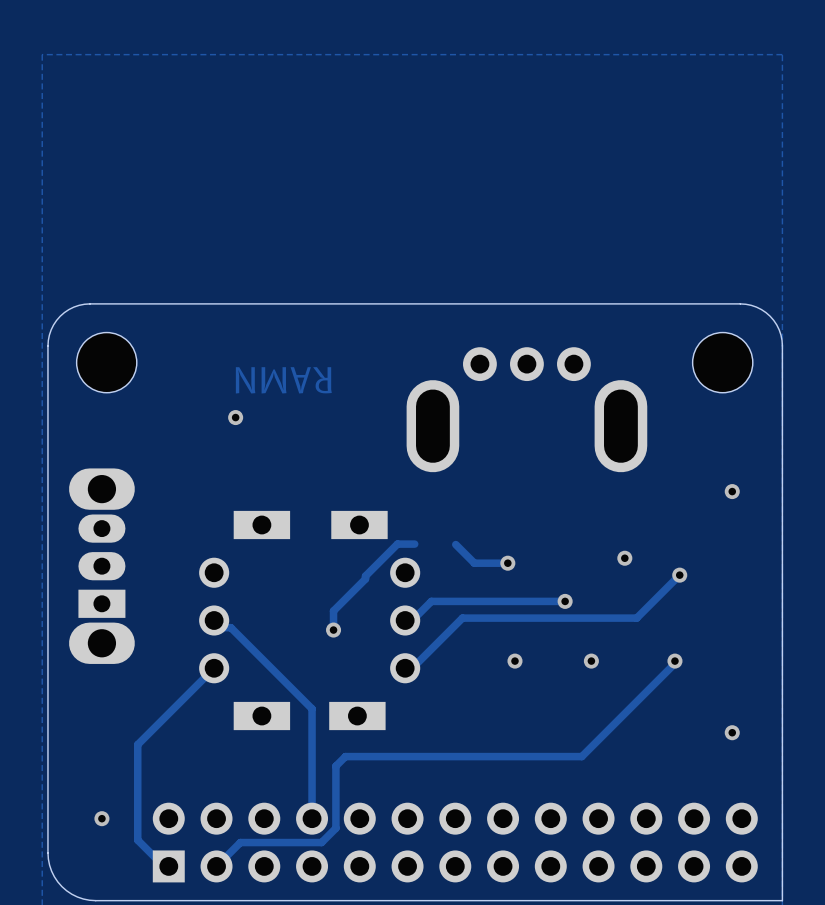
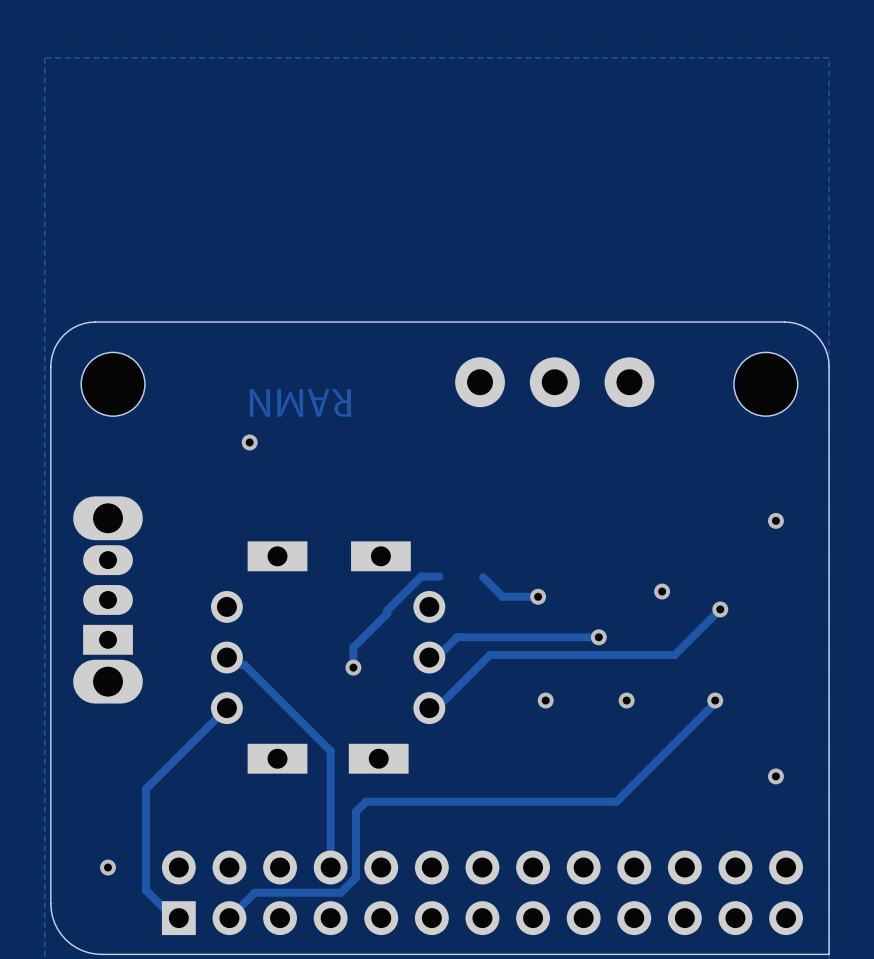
part: none -> (554, 382)
part: (526, 409) -> none

